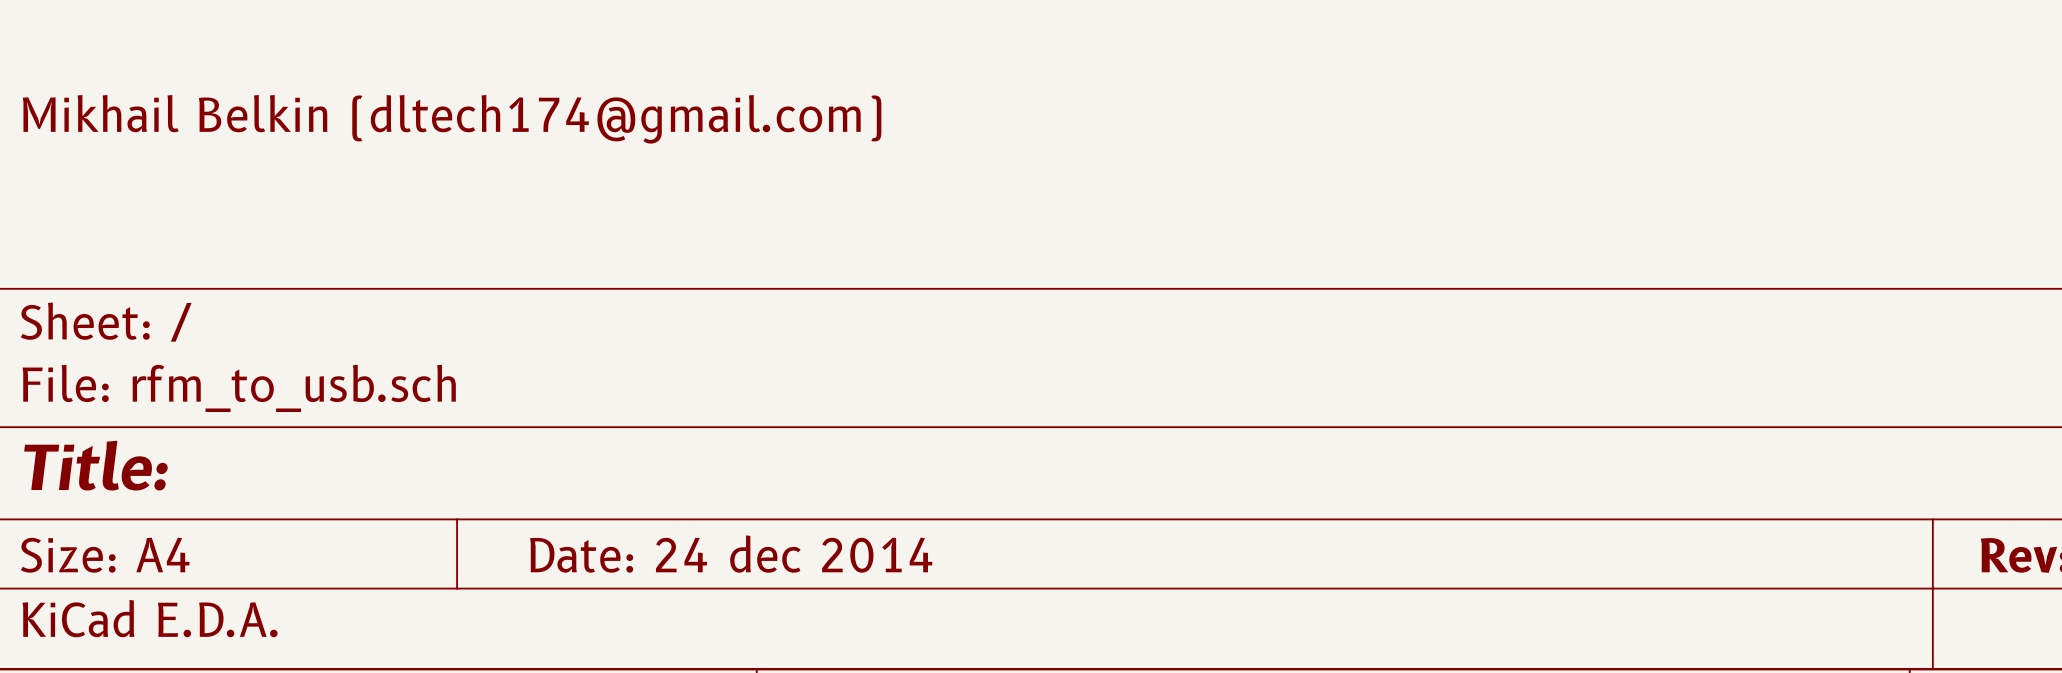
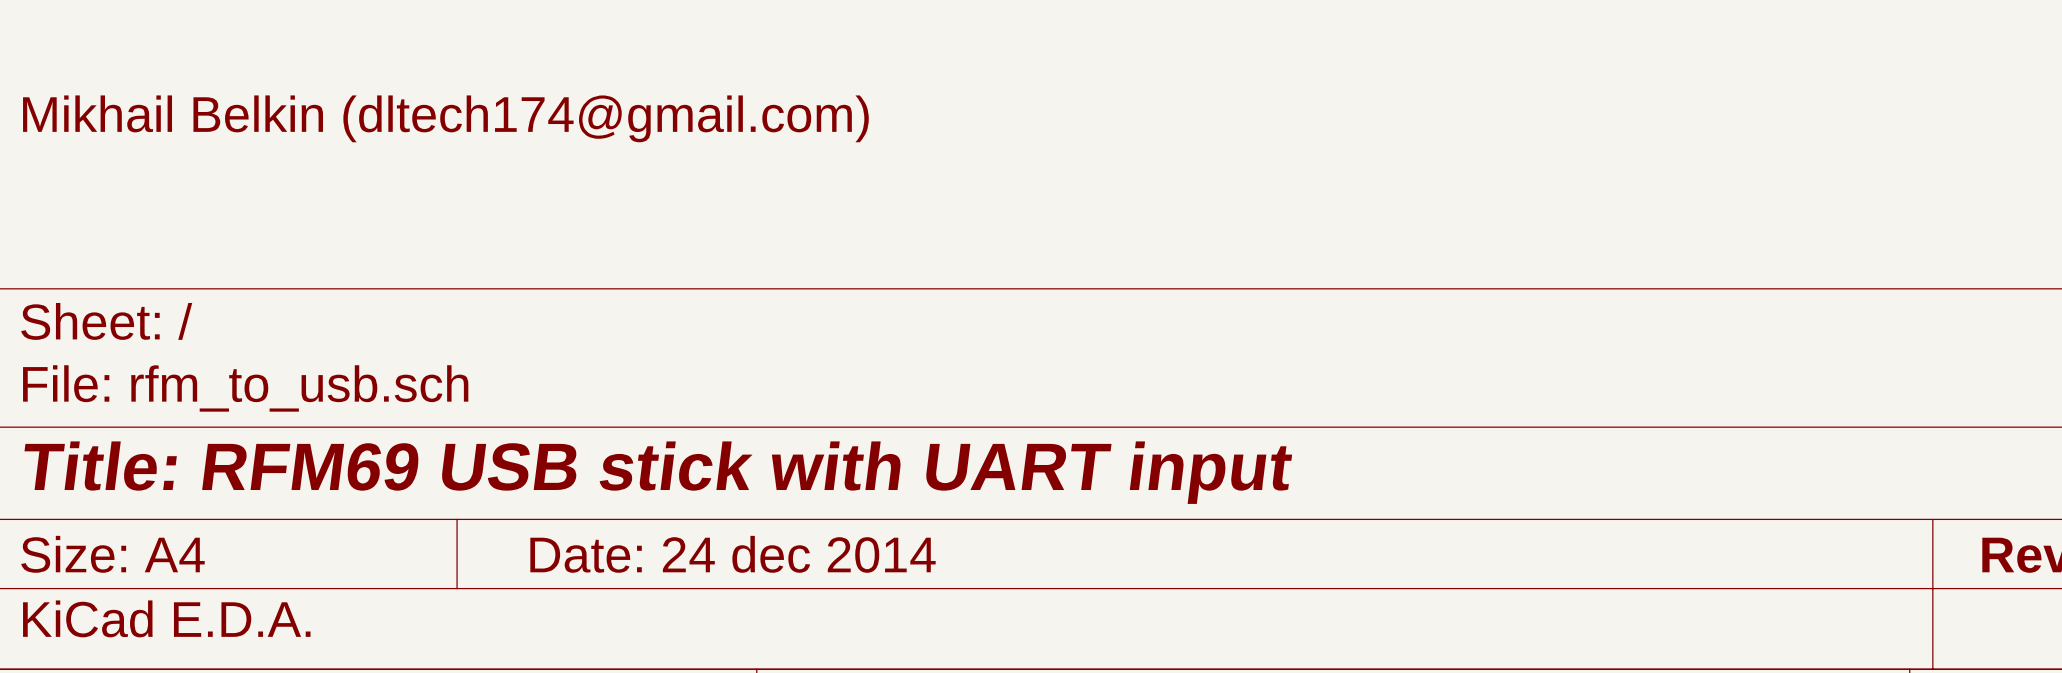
title block: Title: (95, 465) -> Title: RFM69 USB stick with UART input (658, 472)

